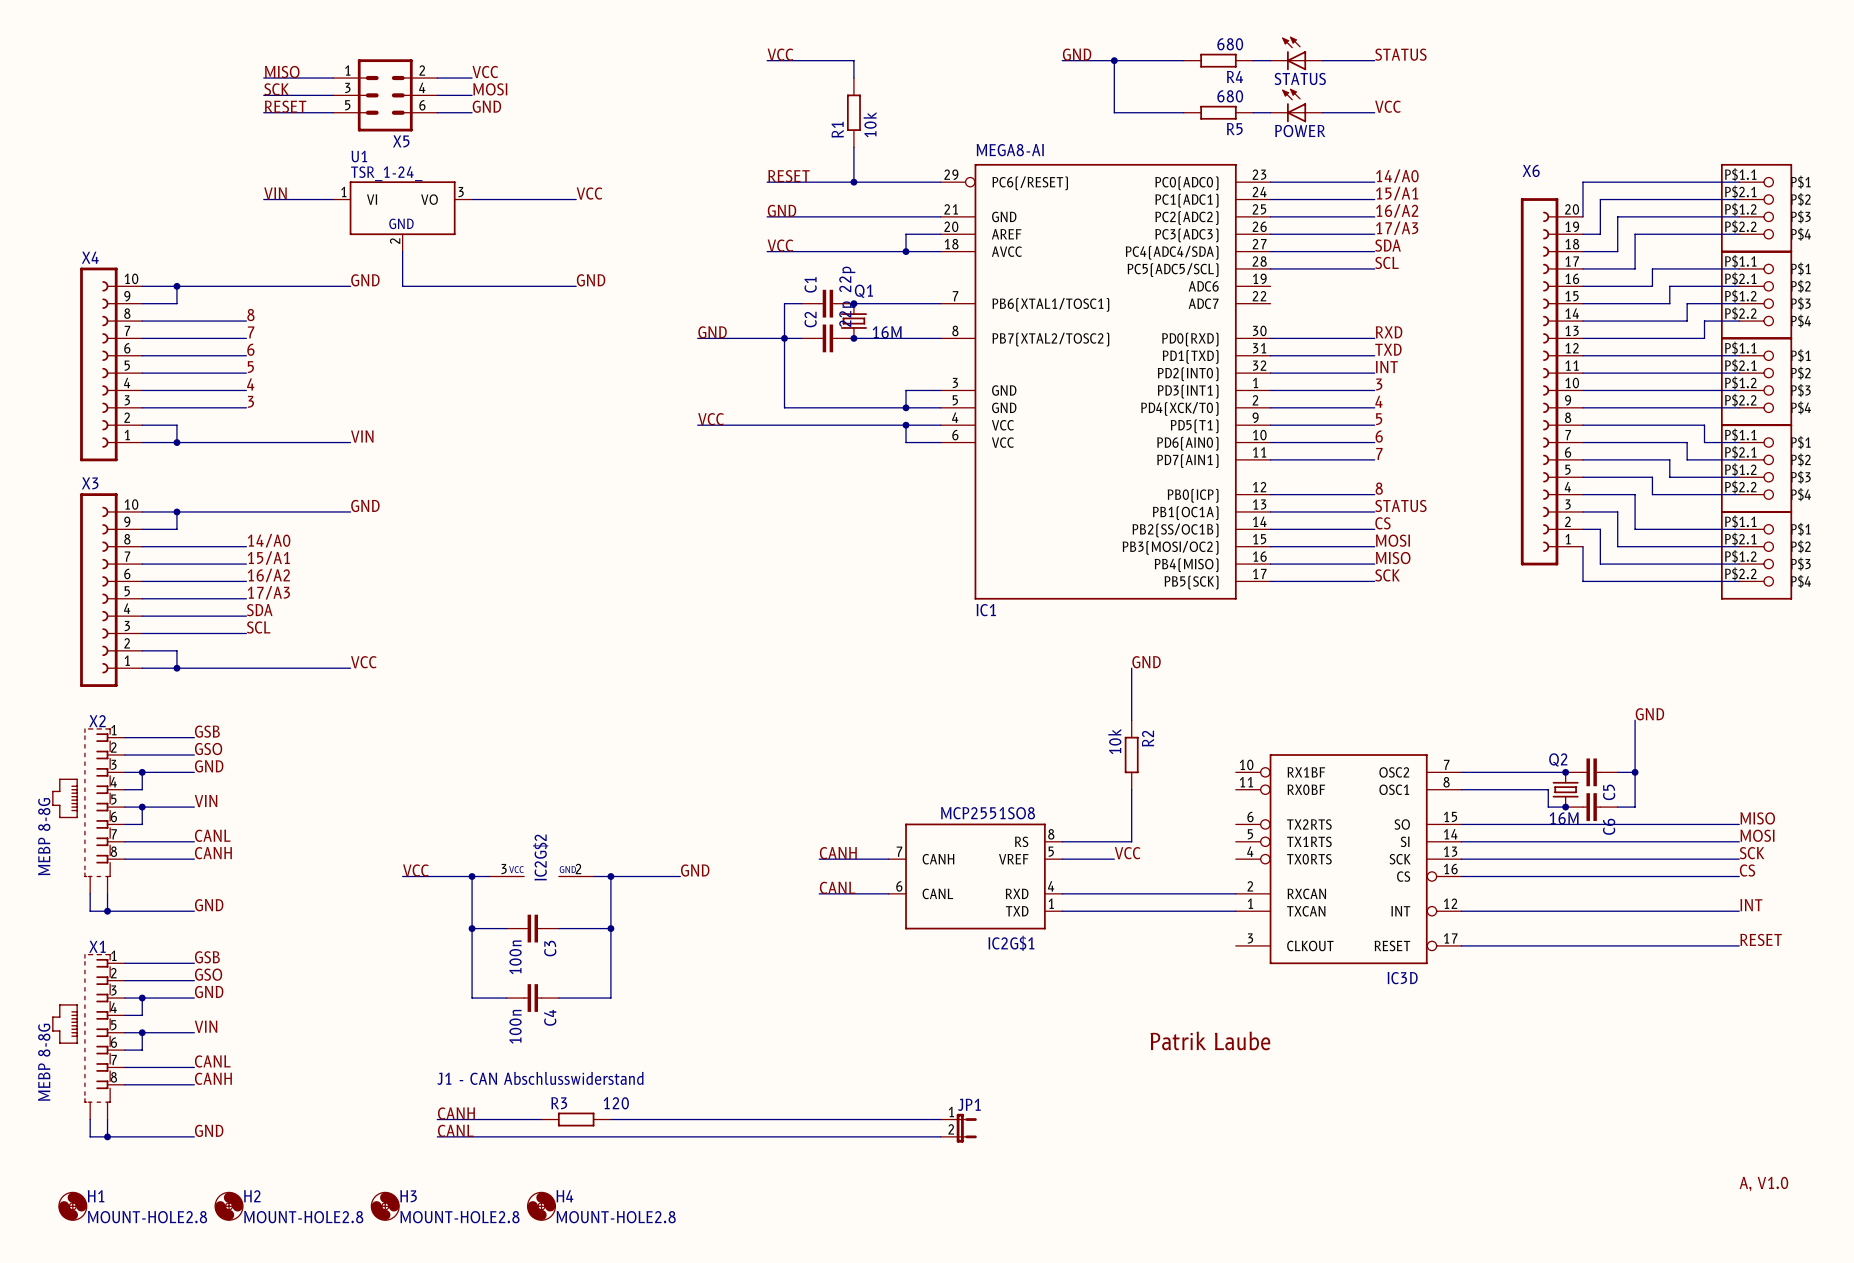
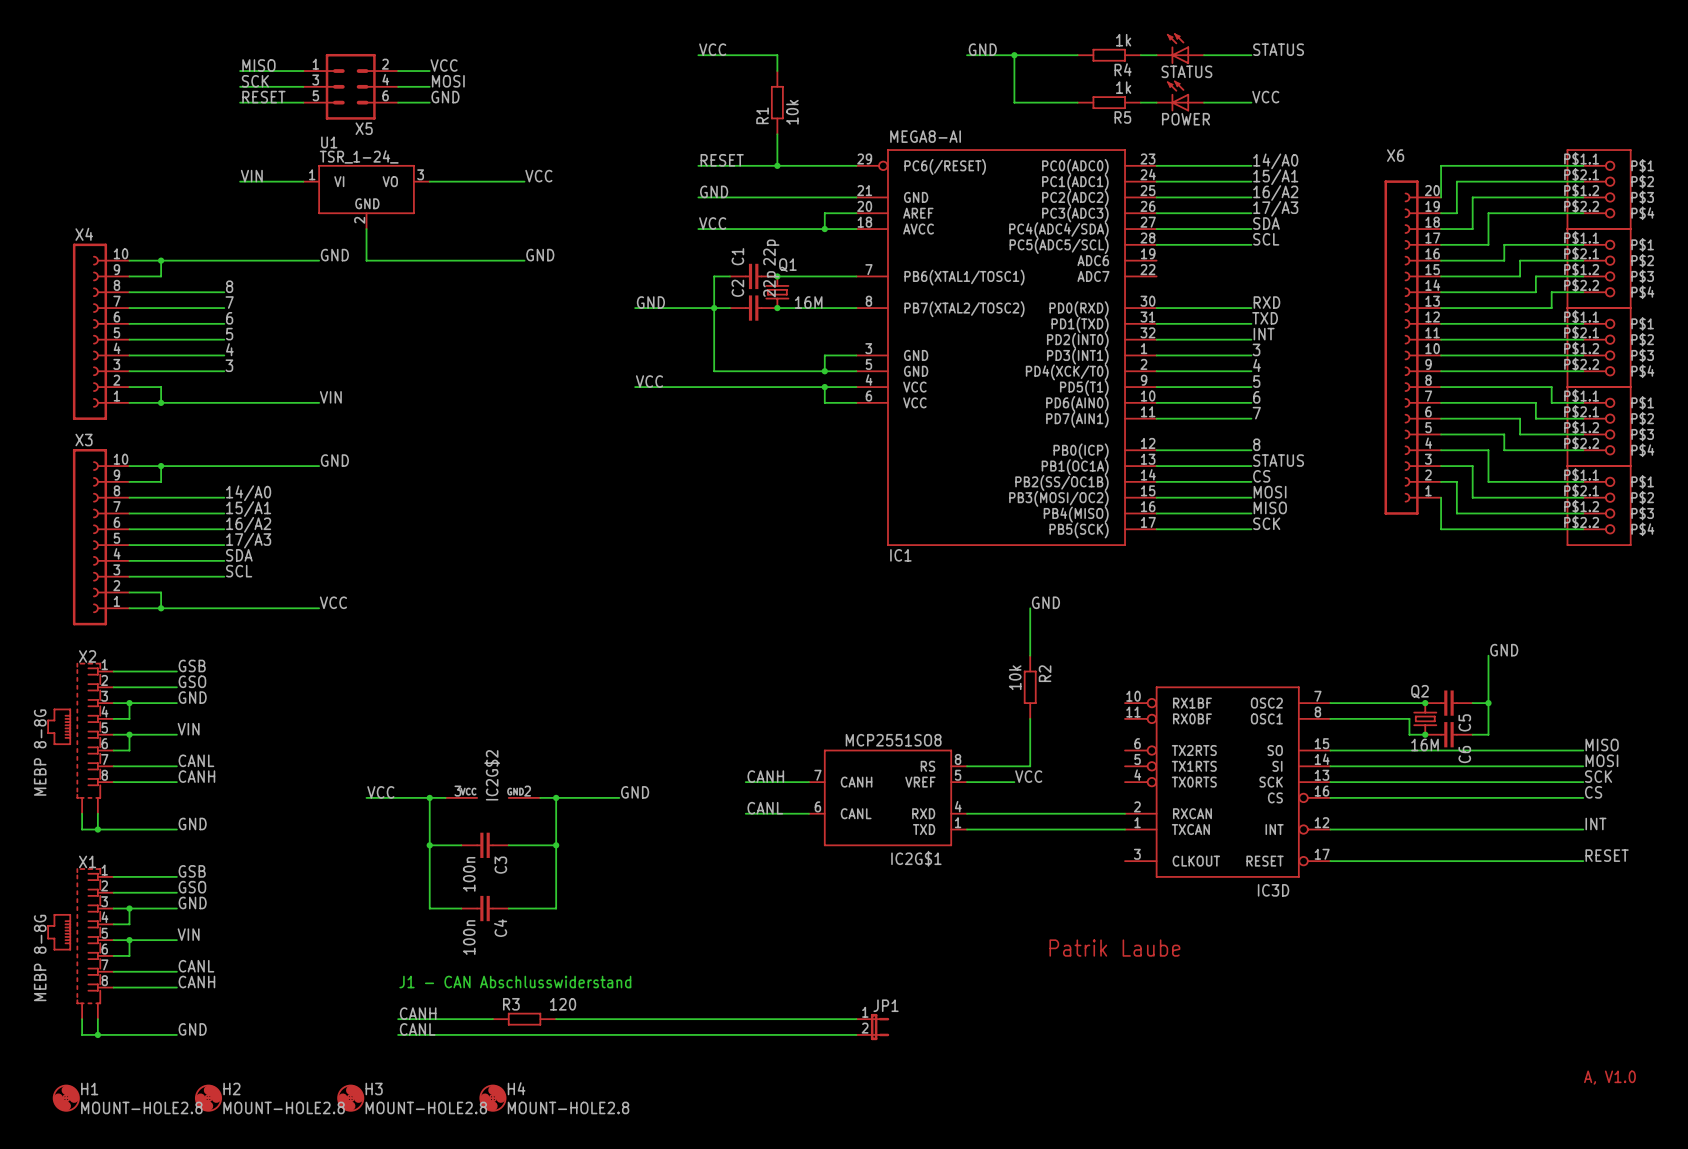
R4 value: 680 (1230, 44) -> 1k (1123, 40)
R5 value: 680 (1230, 96) -> 1k (1123, 87)

